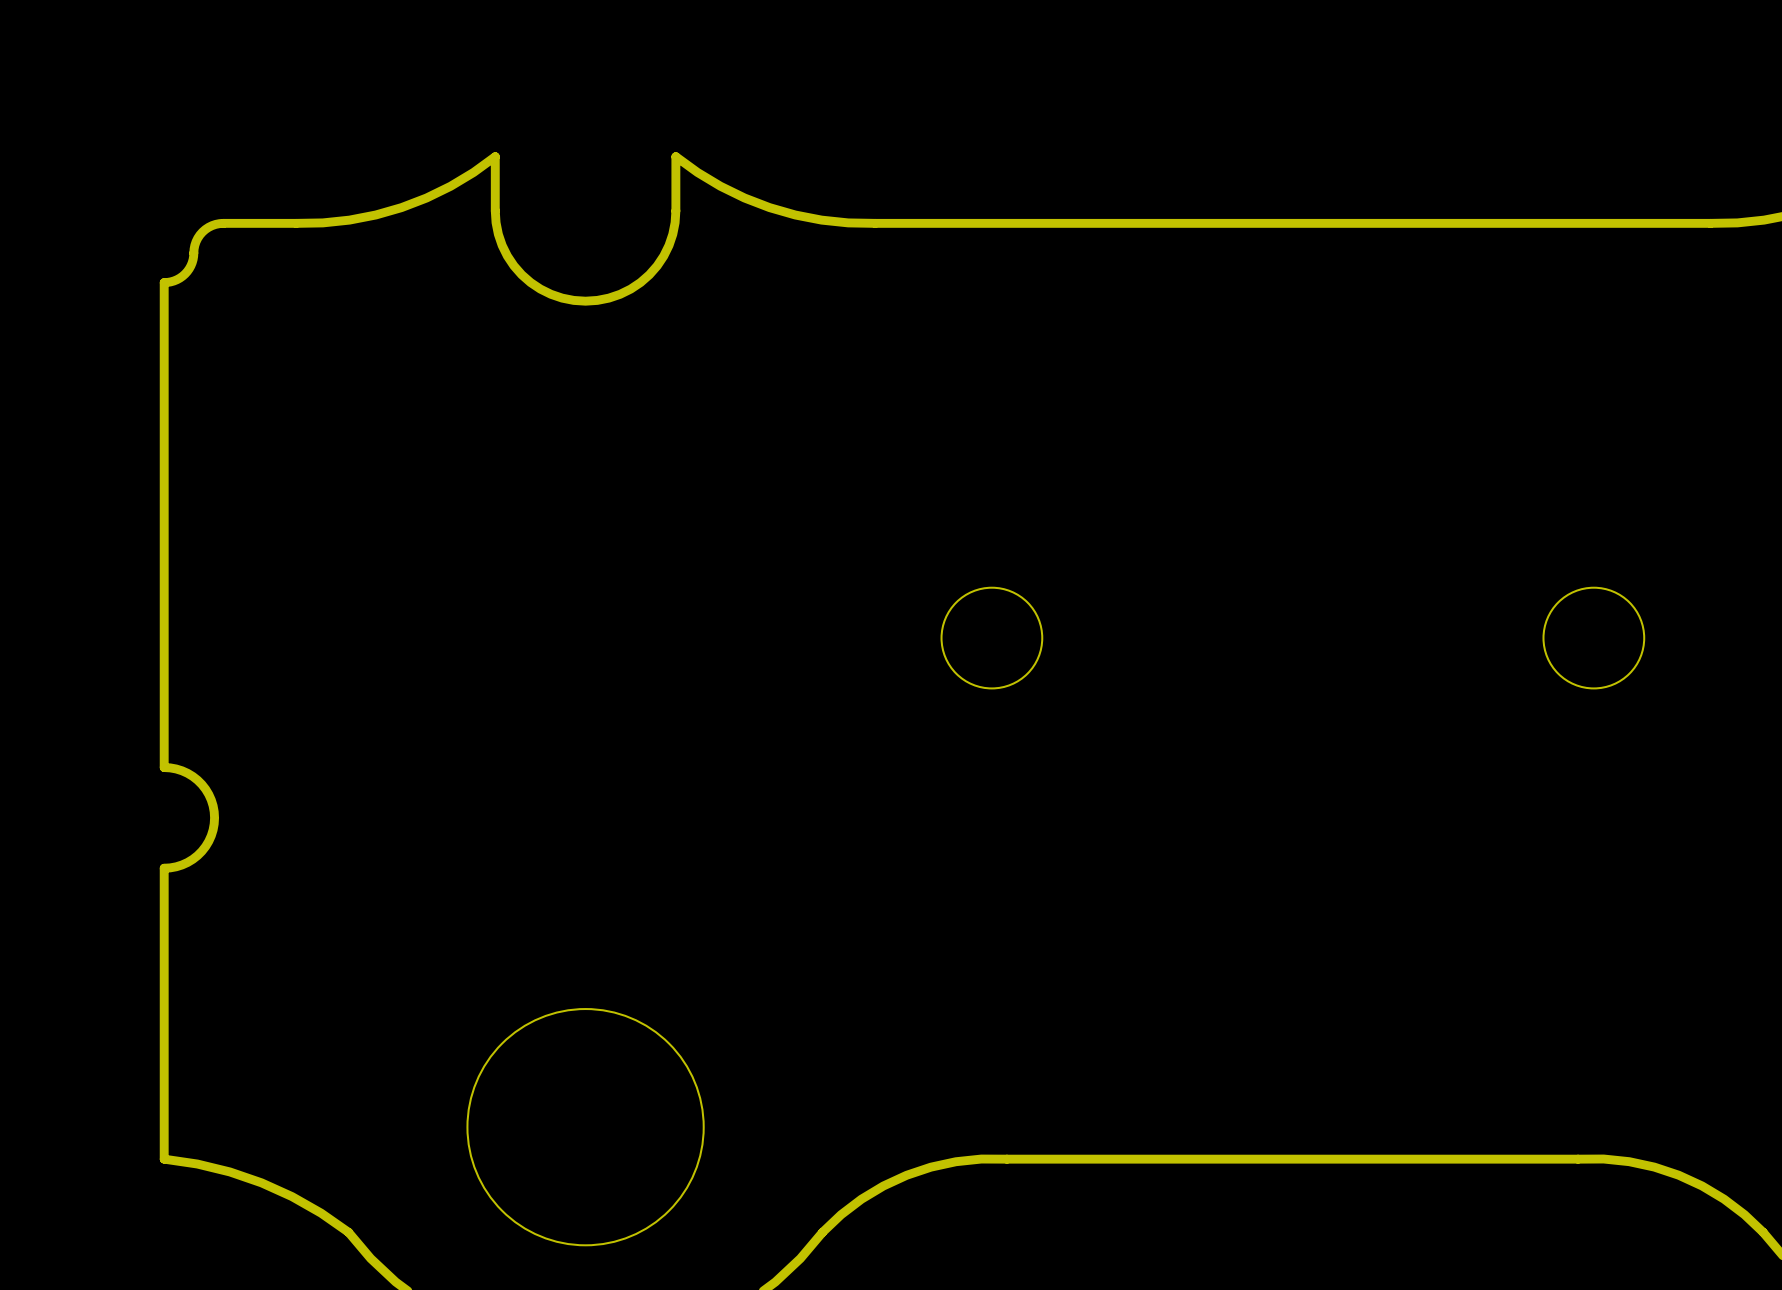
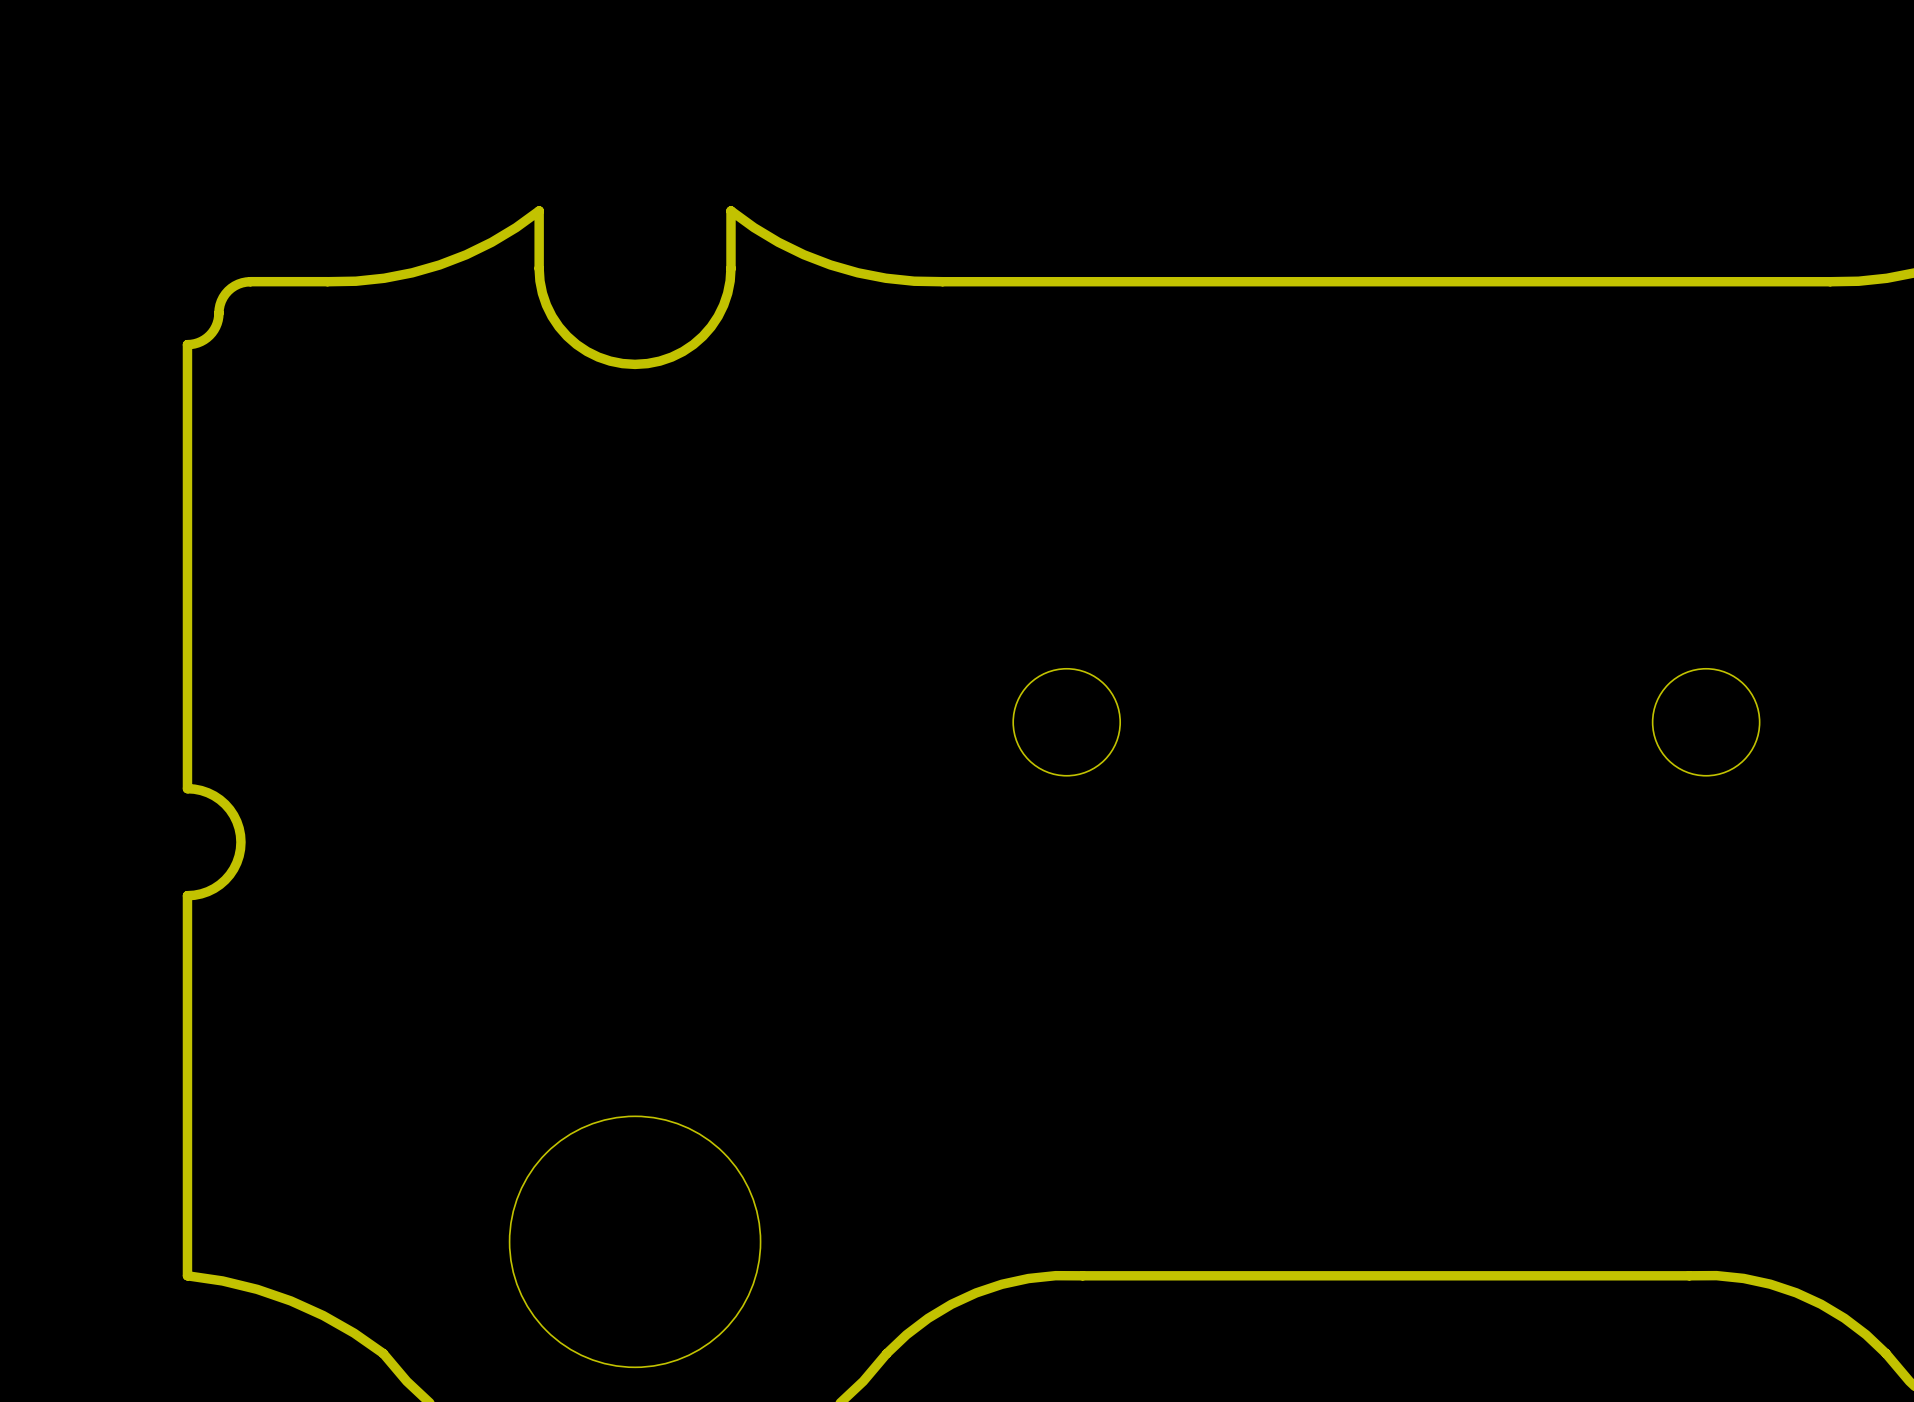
board edge: (164, 700) (164, 767) (182, 770) (201, 784) (211, 800) (214, 817) (208, 841) (197, 855) (182, 864) (164, 868) -> (187, 788) (207, 792) (225, 804) (236, 821) (240, 842) (236, 862) (225, 880) (207, 891) (187, 895) (187, 966)

